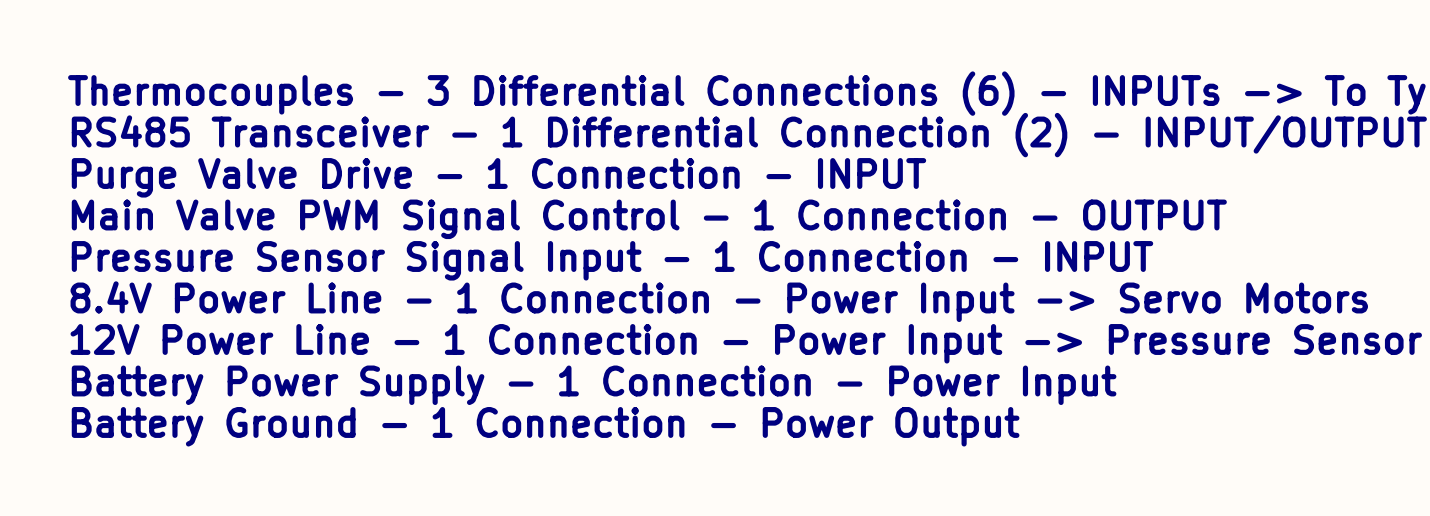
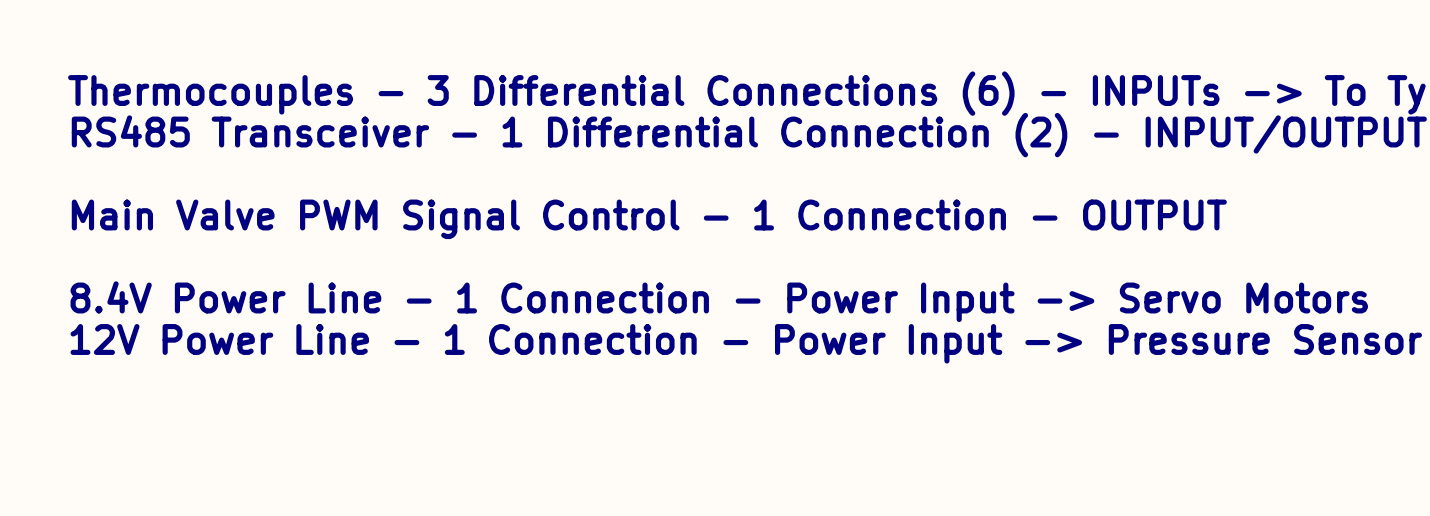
text: Purge Valve Drive - 1 Connection - INPUT (498, 177) -> none
text: Pressure Sensor Signal Input - 1 Connection - INPUT (612, 260) -> none
text: Battery Power Supply - 1 Connection - Power Input (594, 385) -> none
text: Battery Ground - 1 Connection - Power Output (545, 426) -> none

